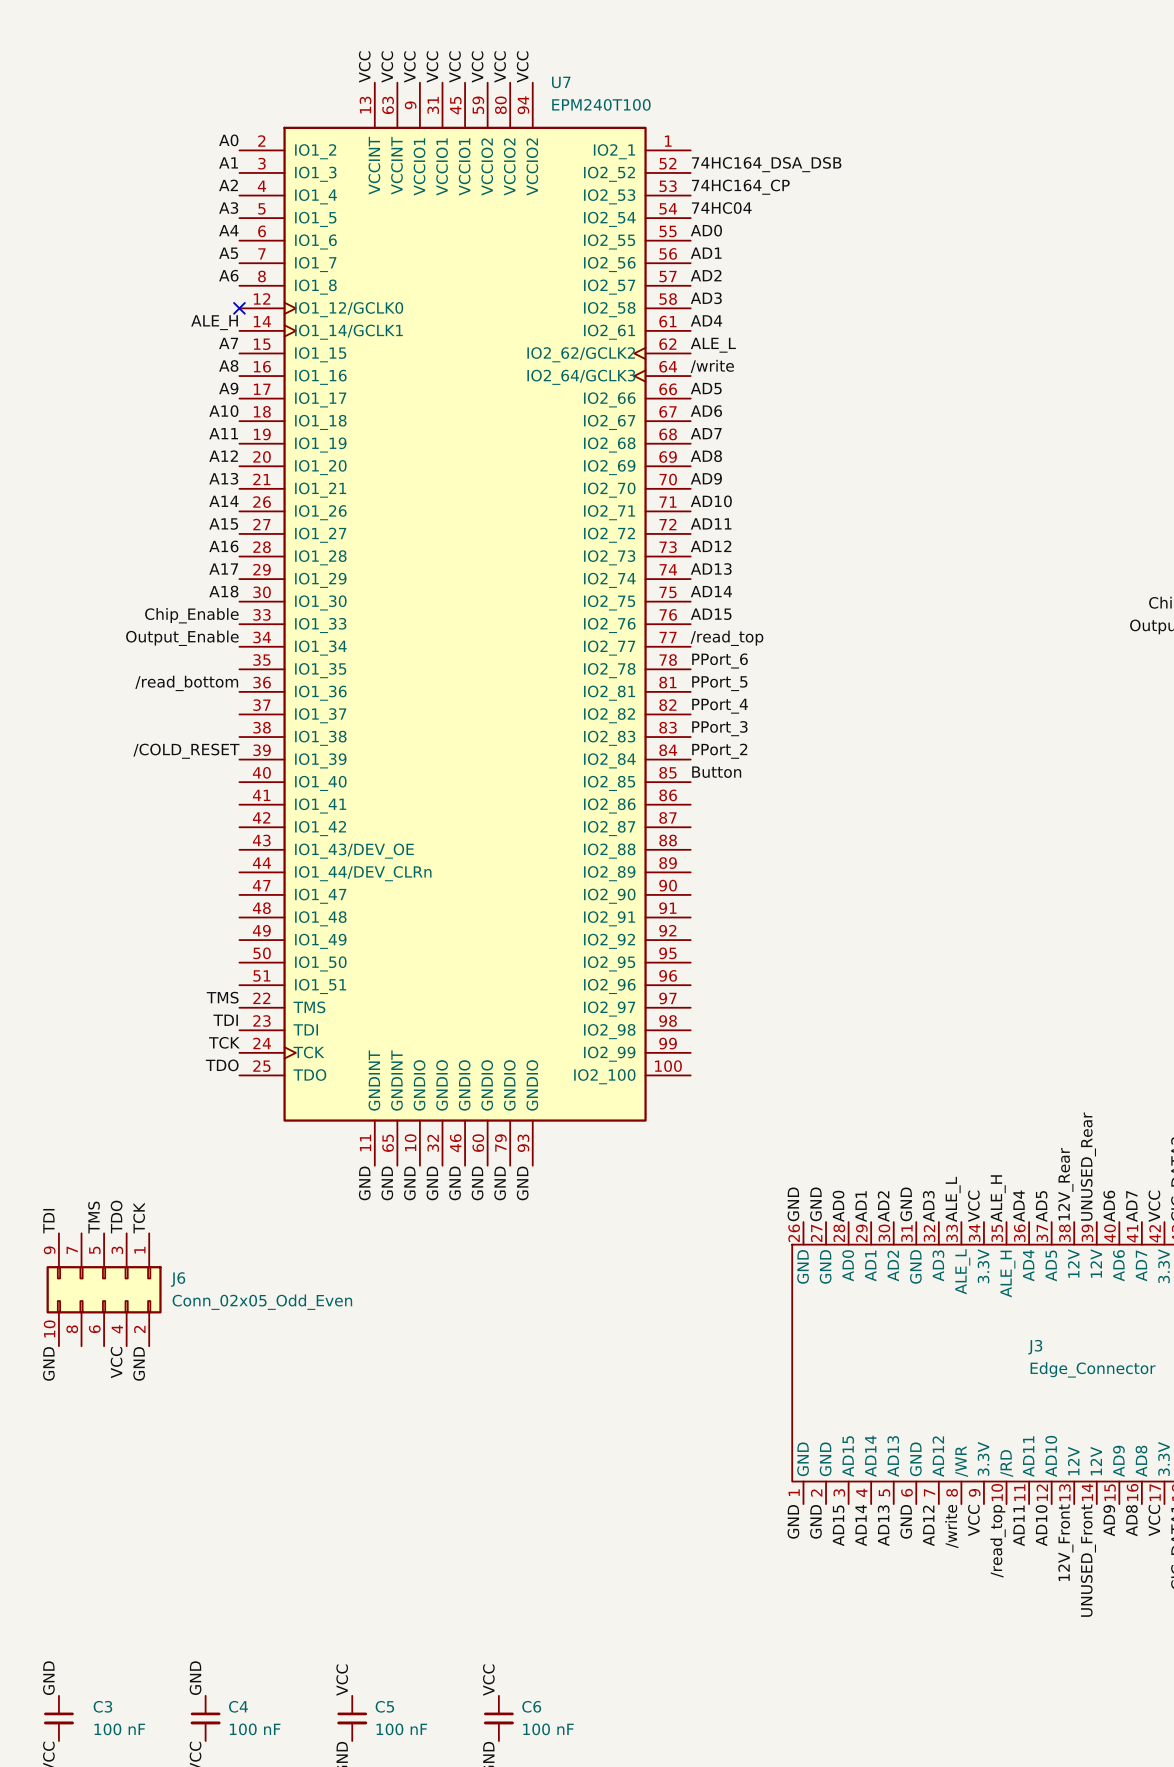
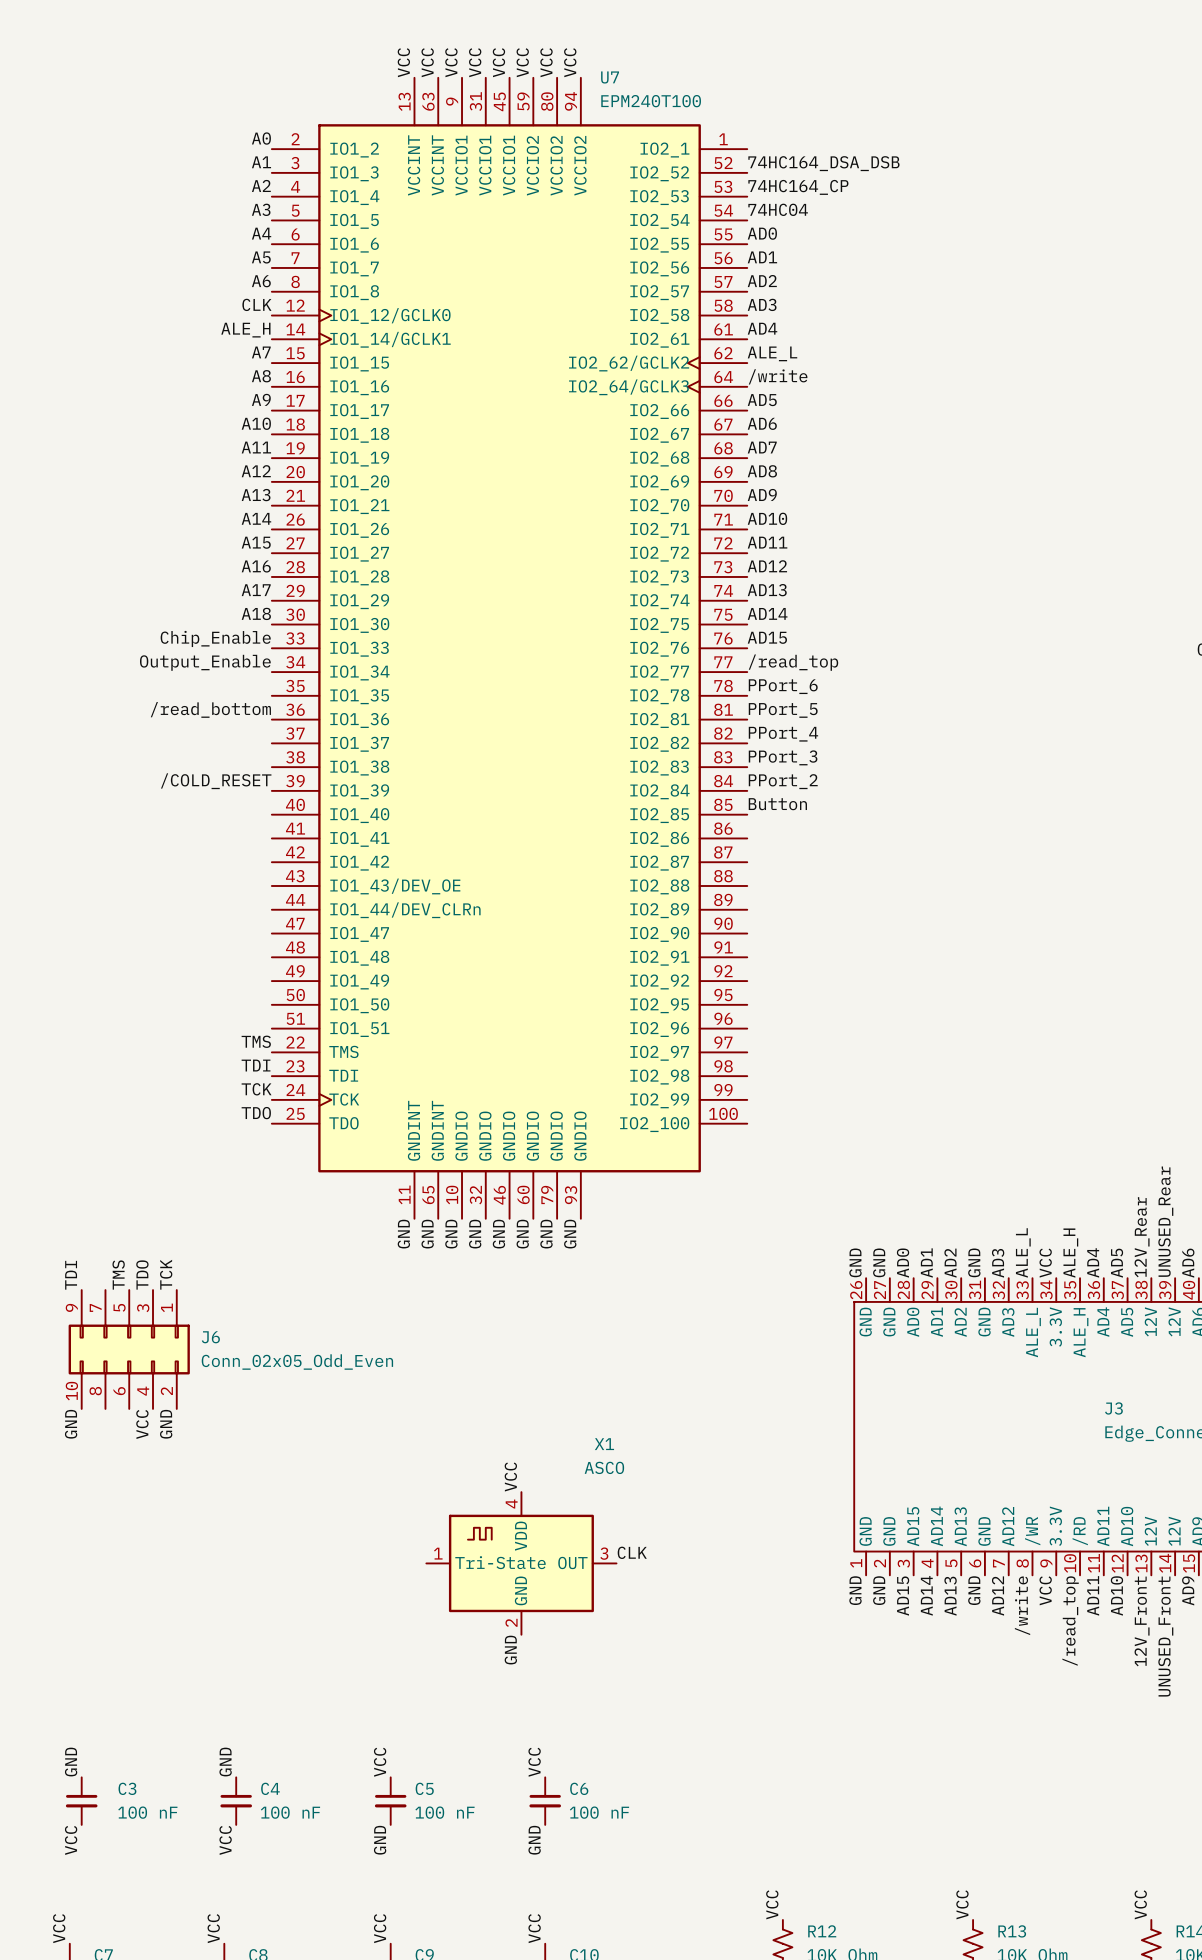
label: none -> CLK (256, 304)
no-connect mark: (239, 308) -> none
label: none -> VCC (510, 1477)
label: none -> CLK (632, 1552)
X1: none -> ASCO (521, 1563)
label: none -> GND (510, 1650)

